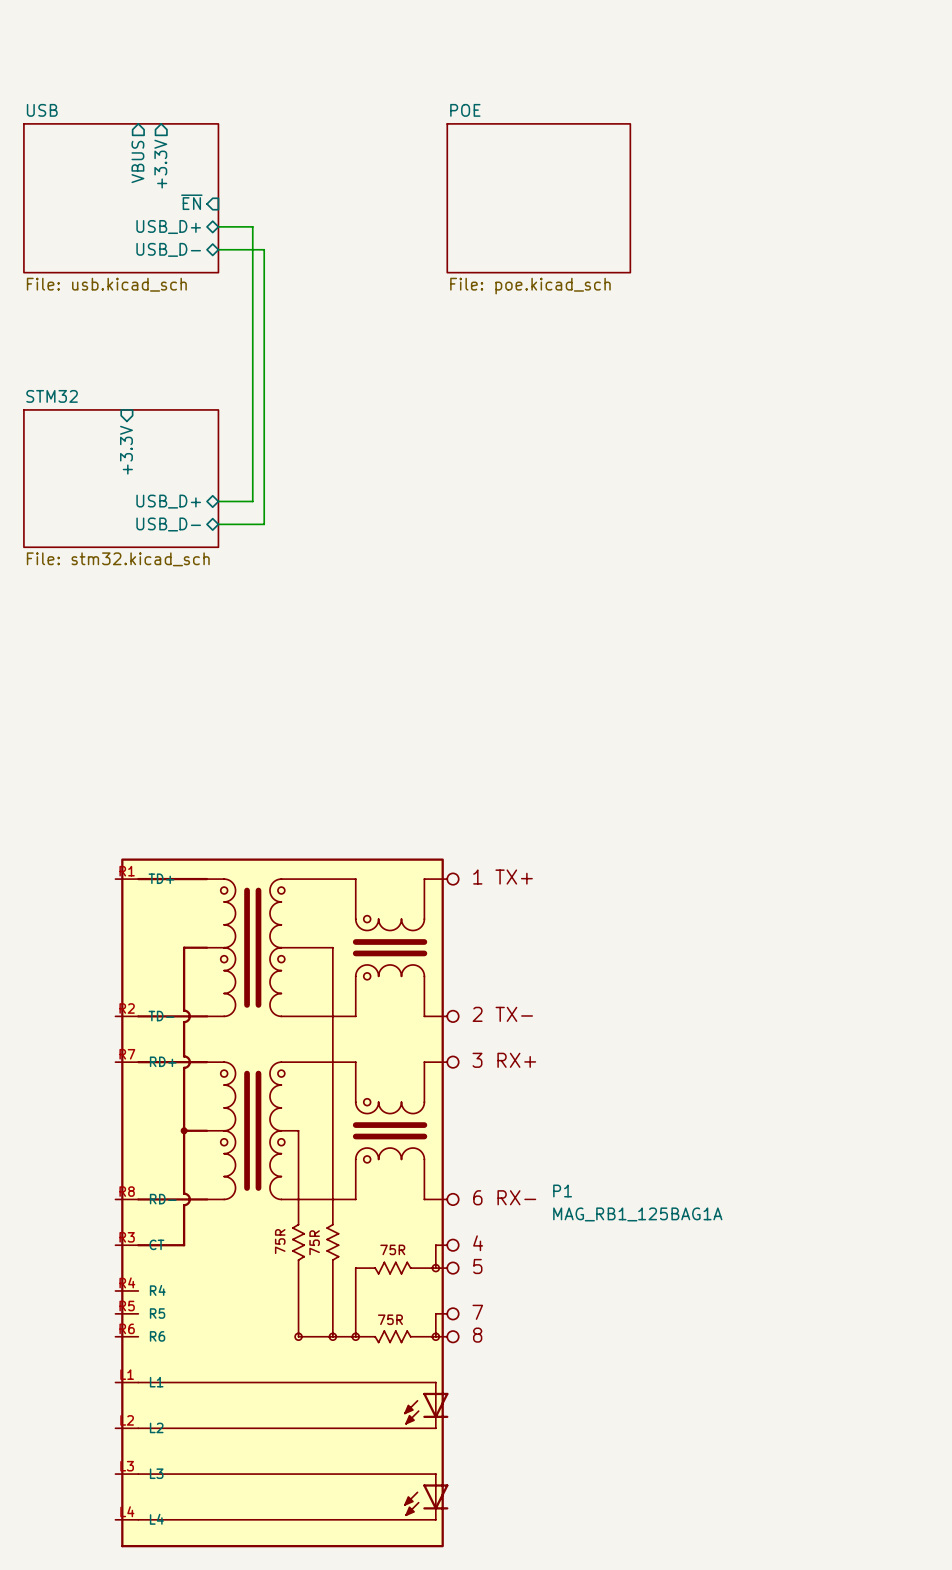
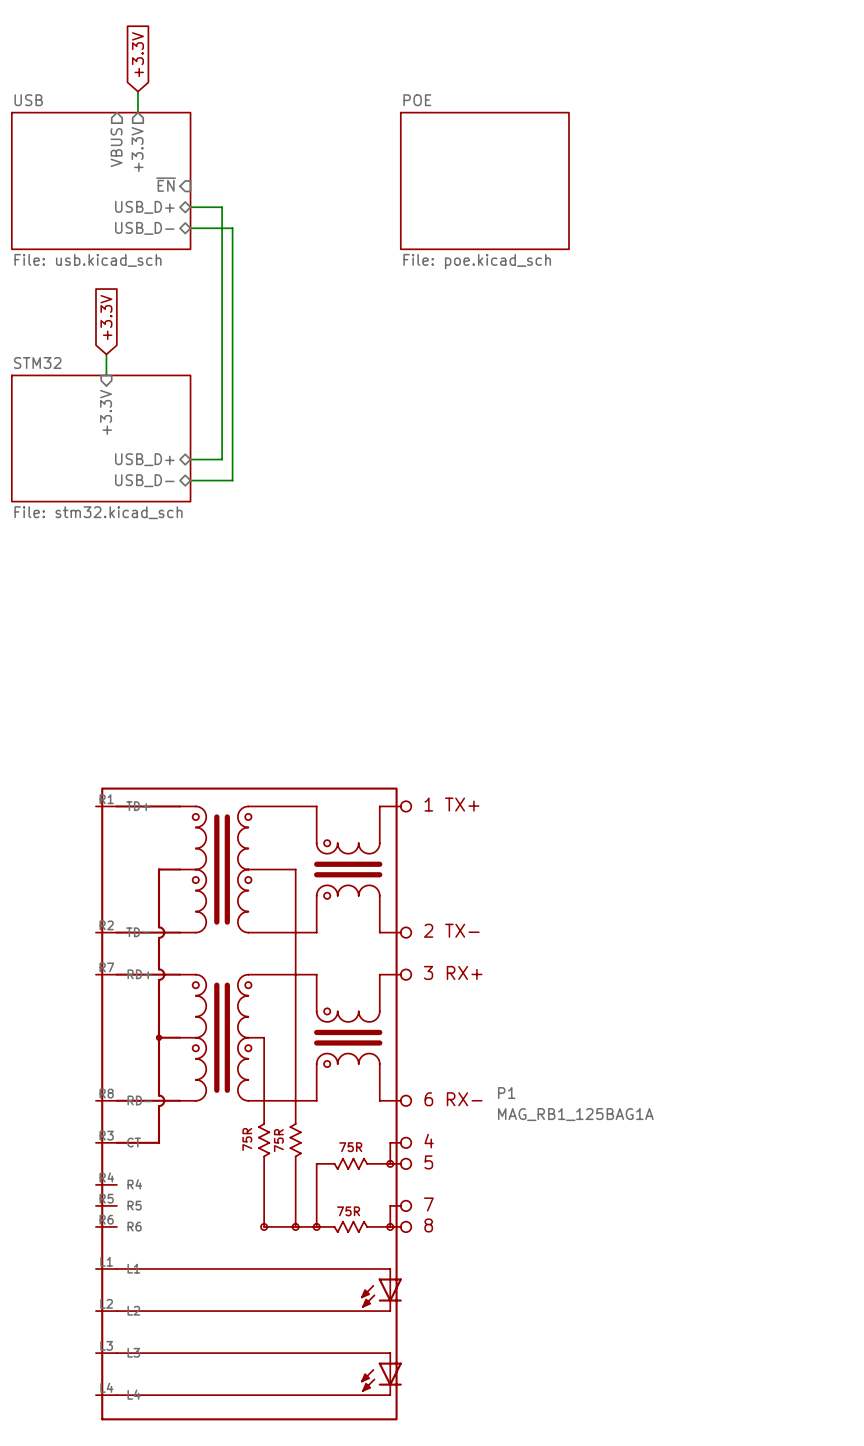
global label: none -> +3.3V (137, 54)
wire: none -> (137, 91) (137, 112)
global label: none -> +3.3V (106, 317)
wire: none -> (106, 354) (106, 375)

